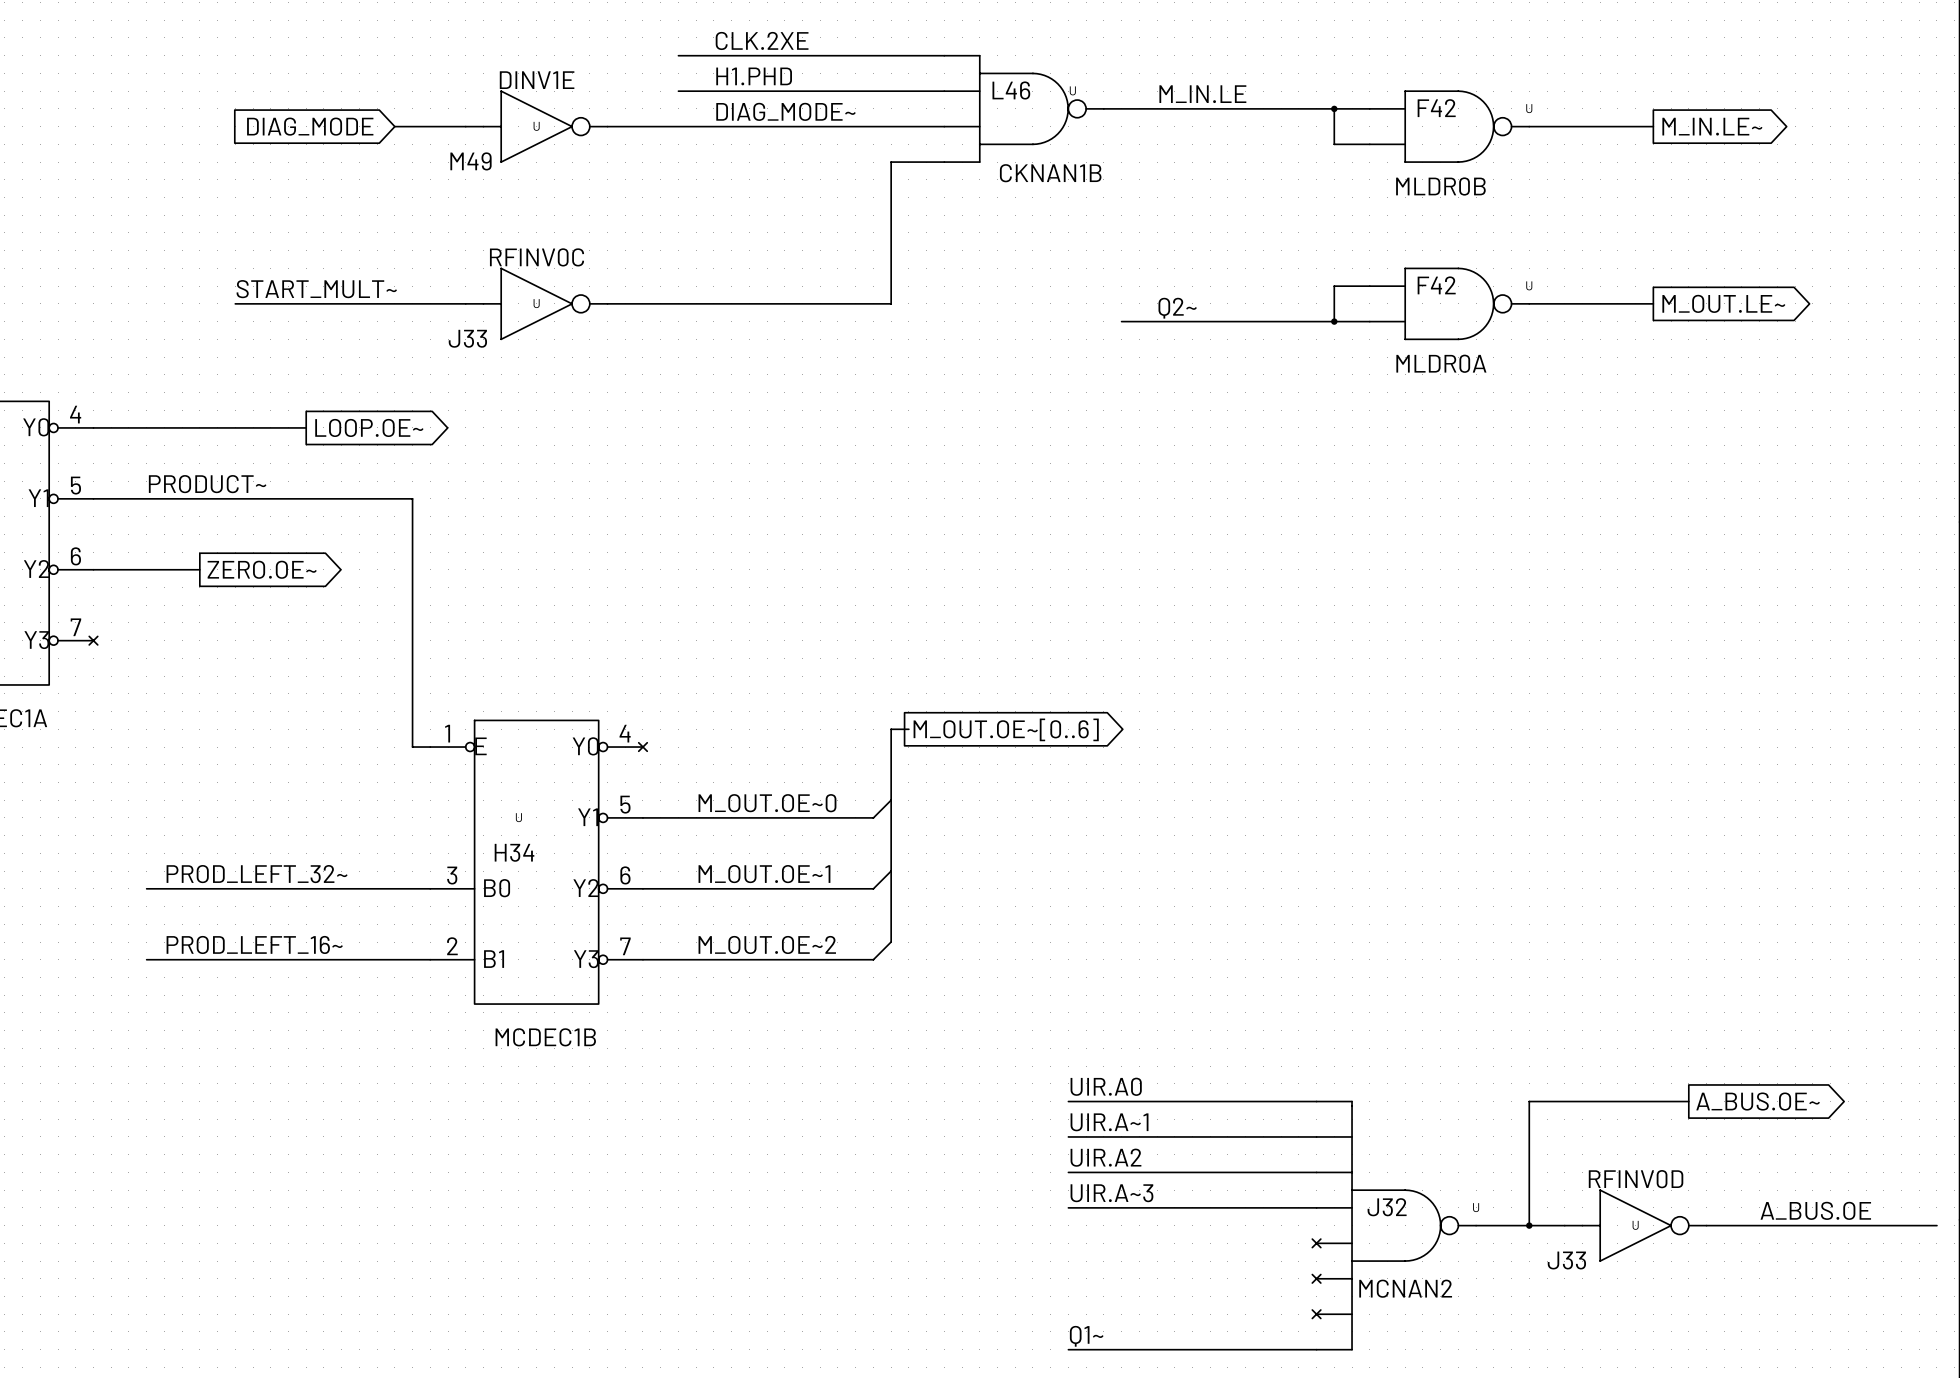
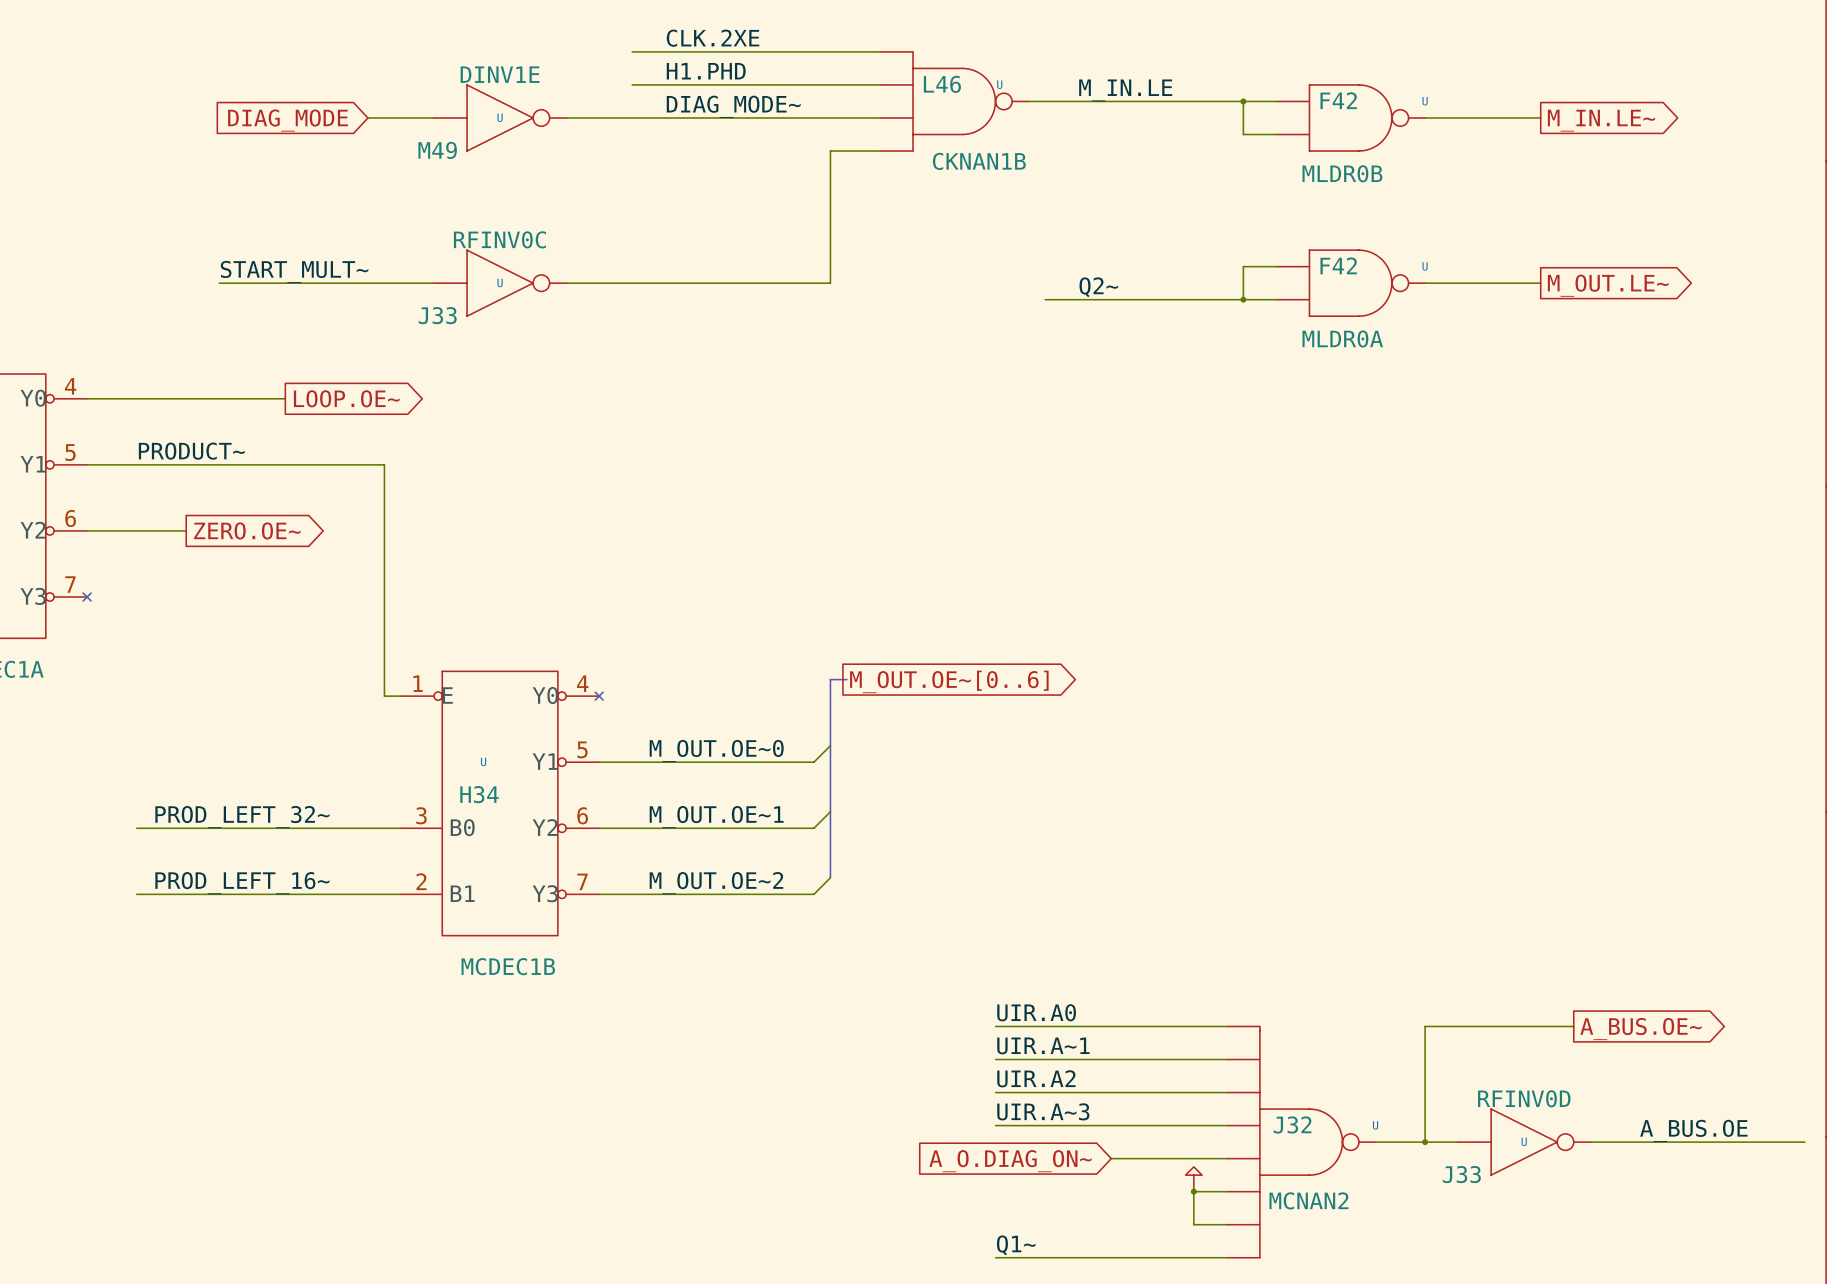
global label: none -> A_O.DIAG_ON~ (1010, 1161)
wire: none -> (1111, 1158) (1226, 1158)
no-connect mark: (1316, 1243) -> none
power symbol: none -> (1193, 1179)
junction: none -> (1193, 1191)
wire: none -> (1226, 1191) (1193, 1191) (1193, 1224) (1226, 1224)
no-connect mark: (1316, 1278) -> none
no-connect mark: (1316, 1314) -> none

